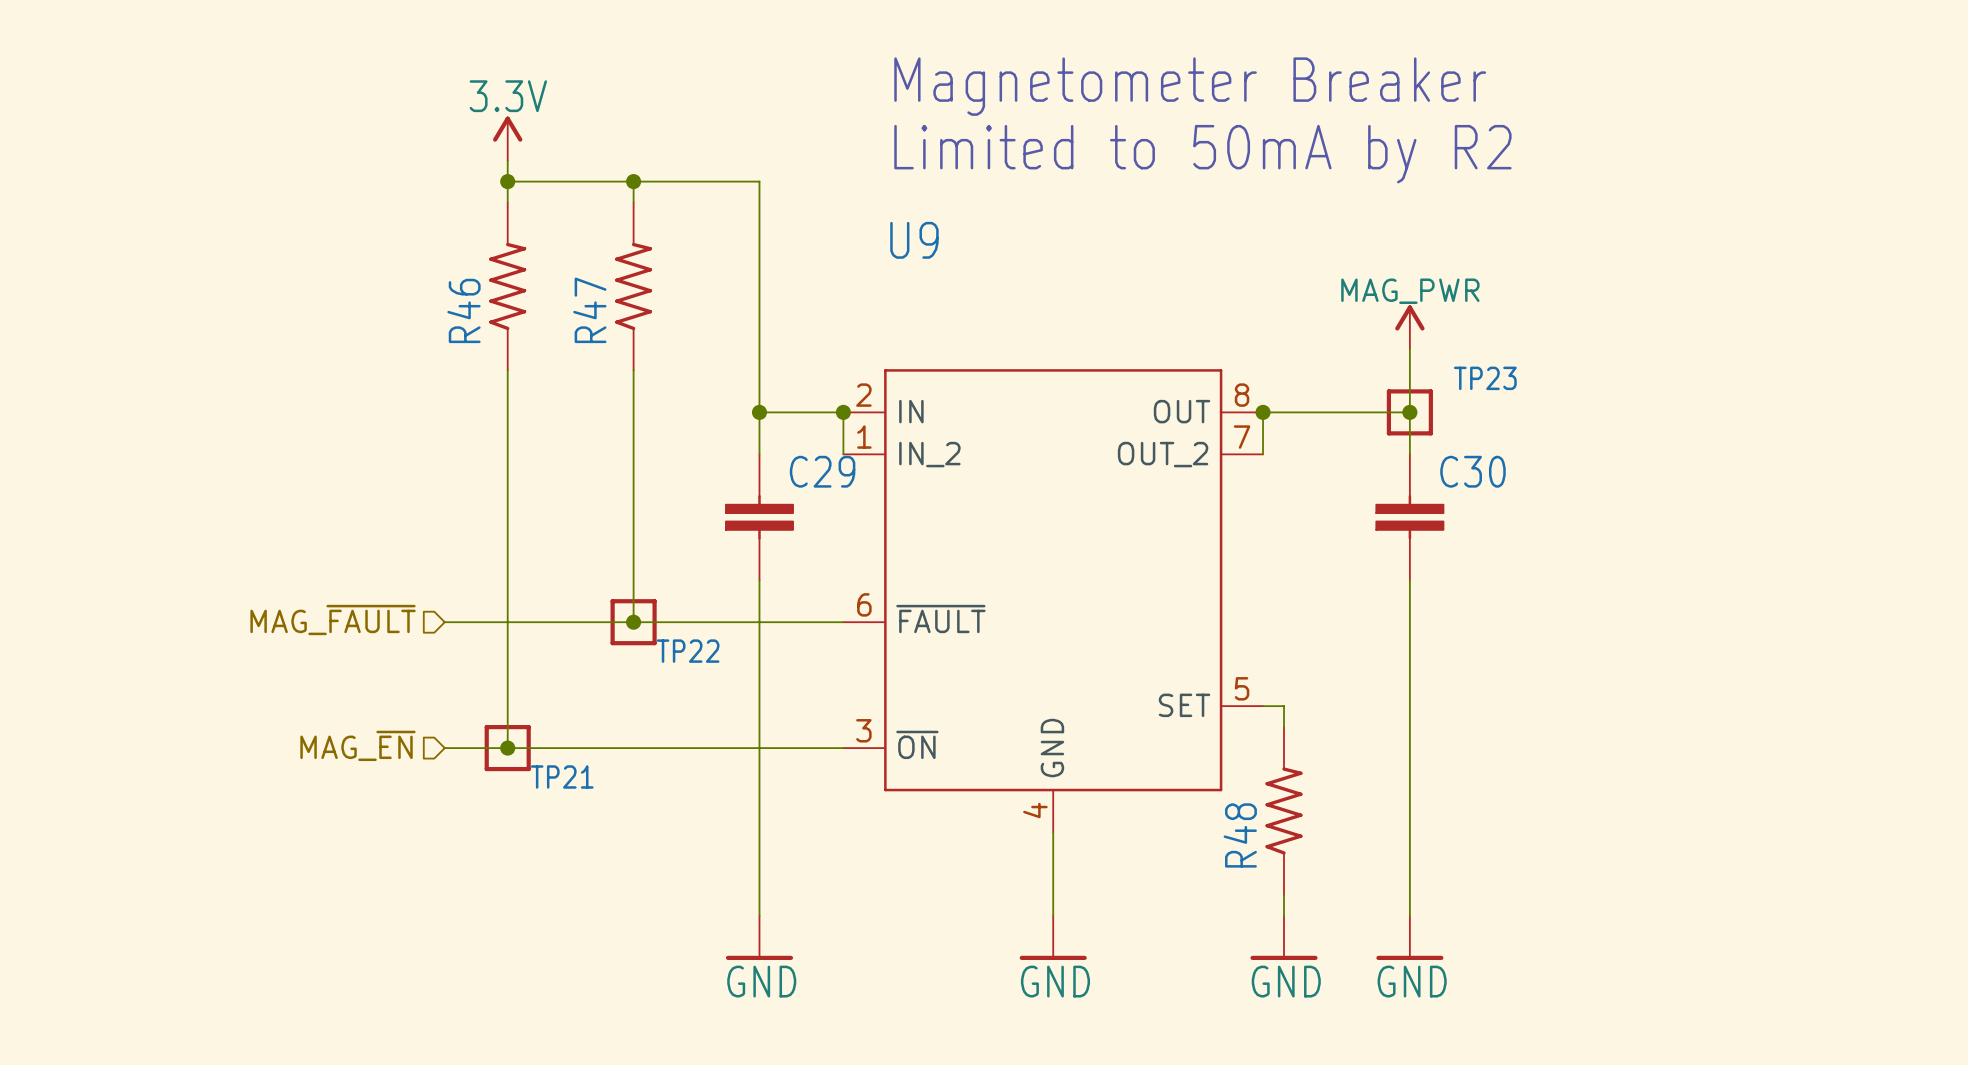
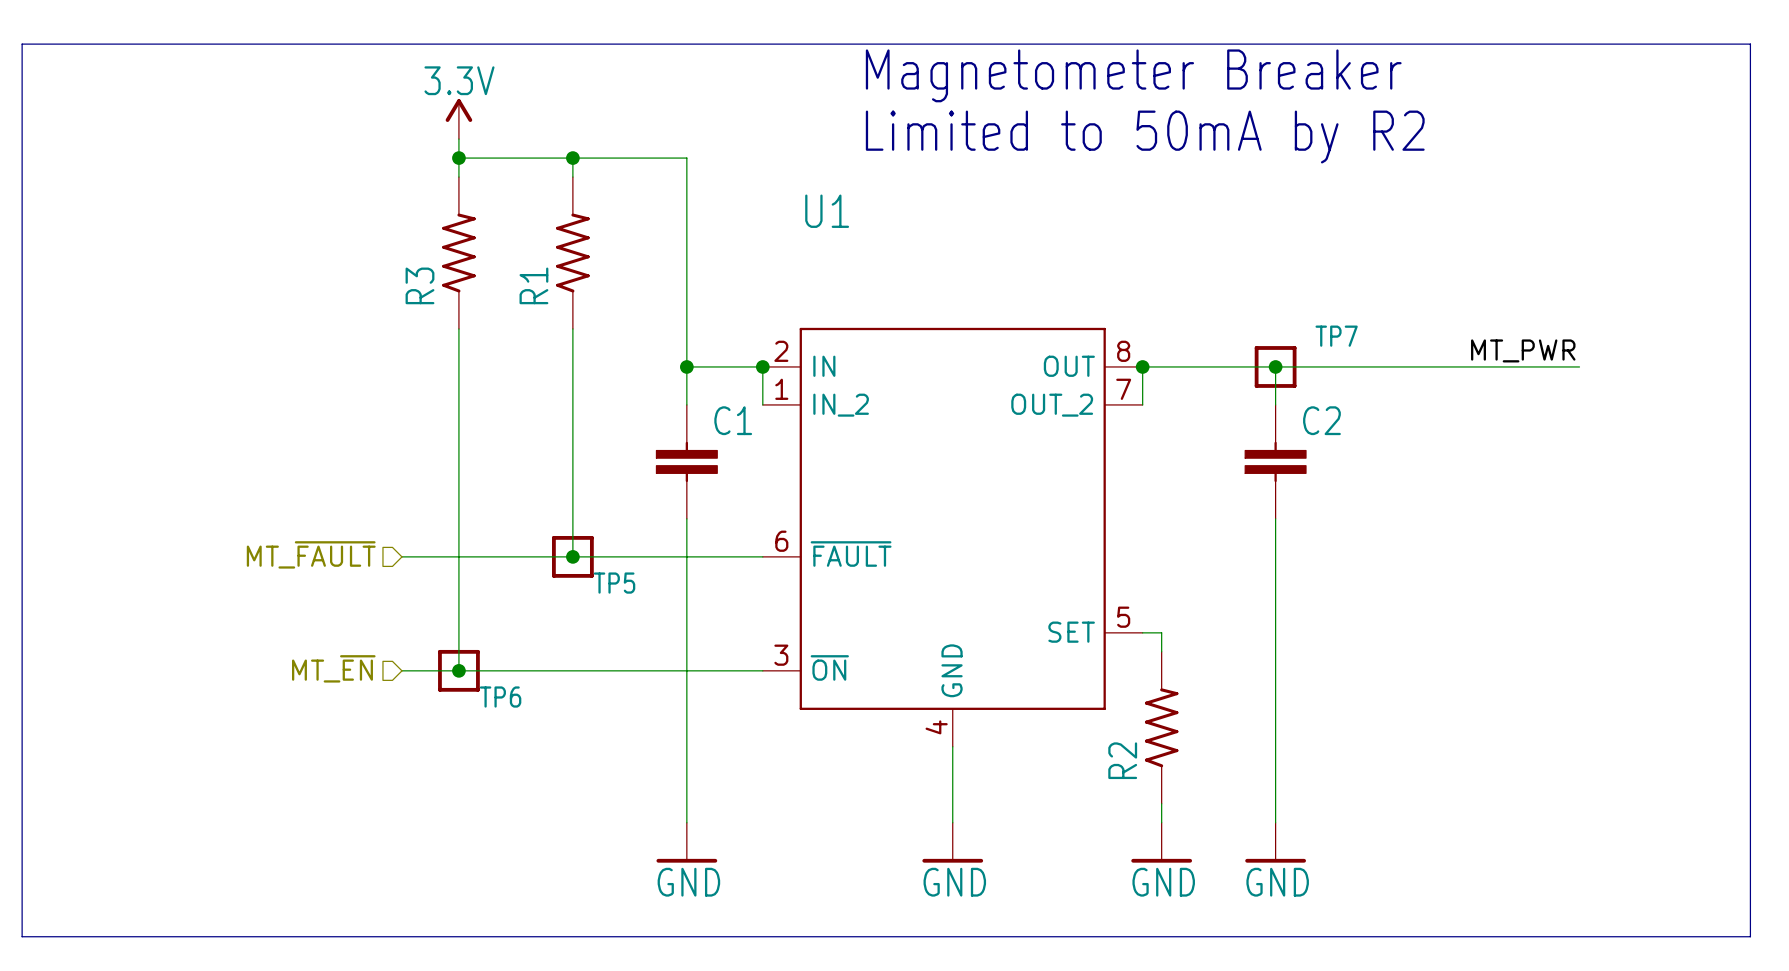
line: none -> (22, 44) (22, 936) (1750, 936) (1750, 44) (22, 44)
text position: Magnetometer Breaker (1190, 86) -> Magnetometer Breaker (1133, 75)
text position: Limited to 50mA by R2 (1202, 154) -> Limited to 50mA by R2 (1145, 137)
U9 name: U9 (914, 240) -> U1 (827, 211)
R46 name: R46 (463, 310) -> R3 (419, 285)
R47 name: R47 (589, 310) -> R1 (533, 285)
power symbol: MAG_PWR (1409, 327) -> none
wire: (1409, 349) (1409, 412) -> (1579, 366) (1275, 366)
TP23 name: TP23 (1485, 378) -> TP7 (1336, 336)
label: none -> MT_PWR (1523, 350)
C29 name: C29 (822, 471) -> C1 (733, 420)
C30 name: C30 (1472, 471) -> C2 (1321, 420)
hierarchical label: MAG_~{FAULT} (333, 620) -> MT_~{FAULT} (311, 554)
TP22 name: TP22 (688, 651) -> TP5 (614, 583)
hierarchical label: MAG_~{EN} (357, 745) -> MT_~{EN} (333, 668)
TP21 name: TP21 (562, 776) -> TP6 (500, 697)
R48 name: R48 (1240, 835) -> R2 (1122, 760)

